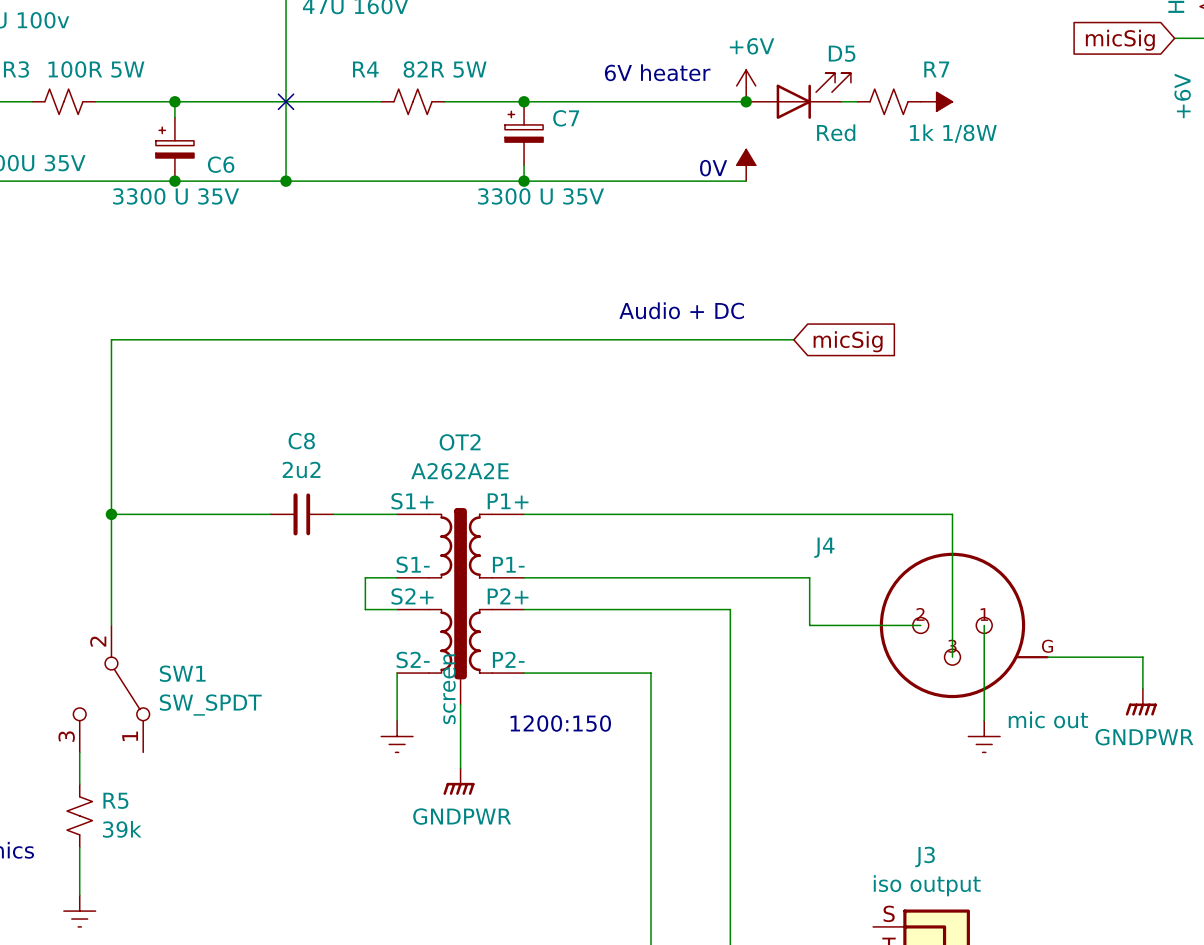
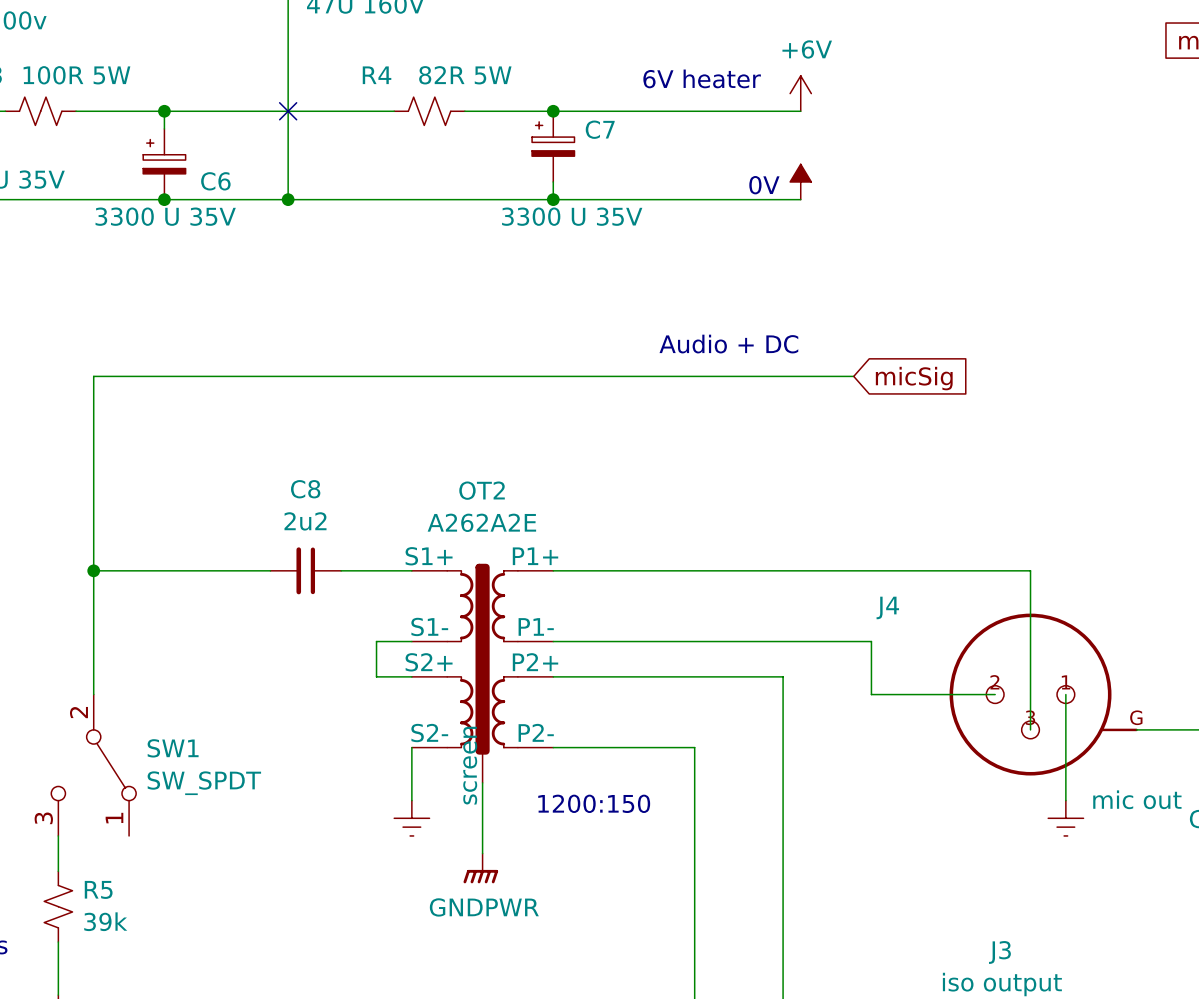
D5: Red (798, 96) -> none
junction: (746, 101) -> none
wire: (841, 101) (857, 101) -> none
R7: 1k 1/8W (889, 101) -> none
power symbol: (936, 101) -> none

